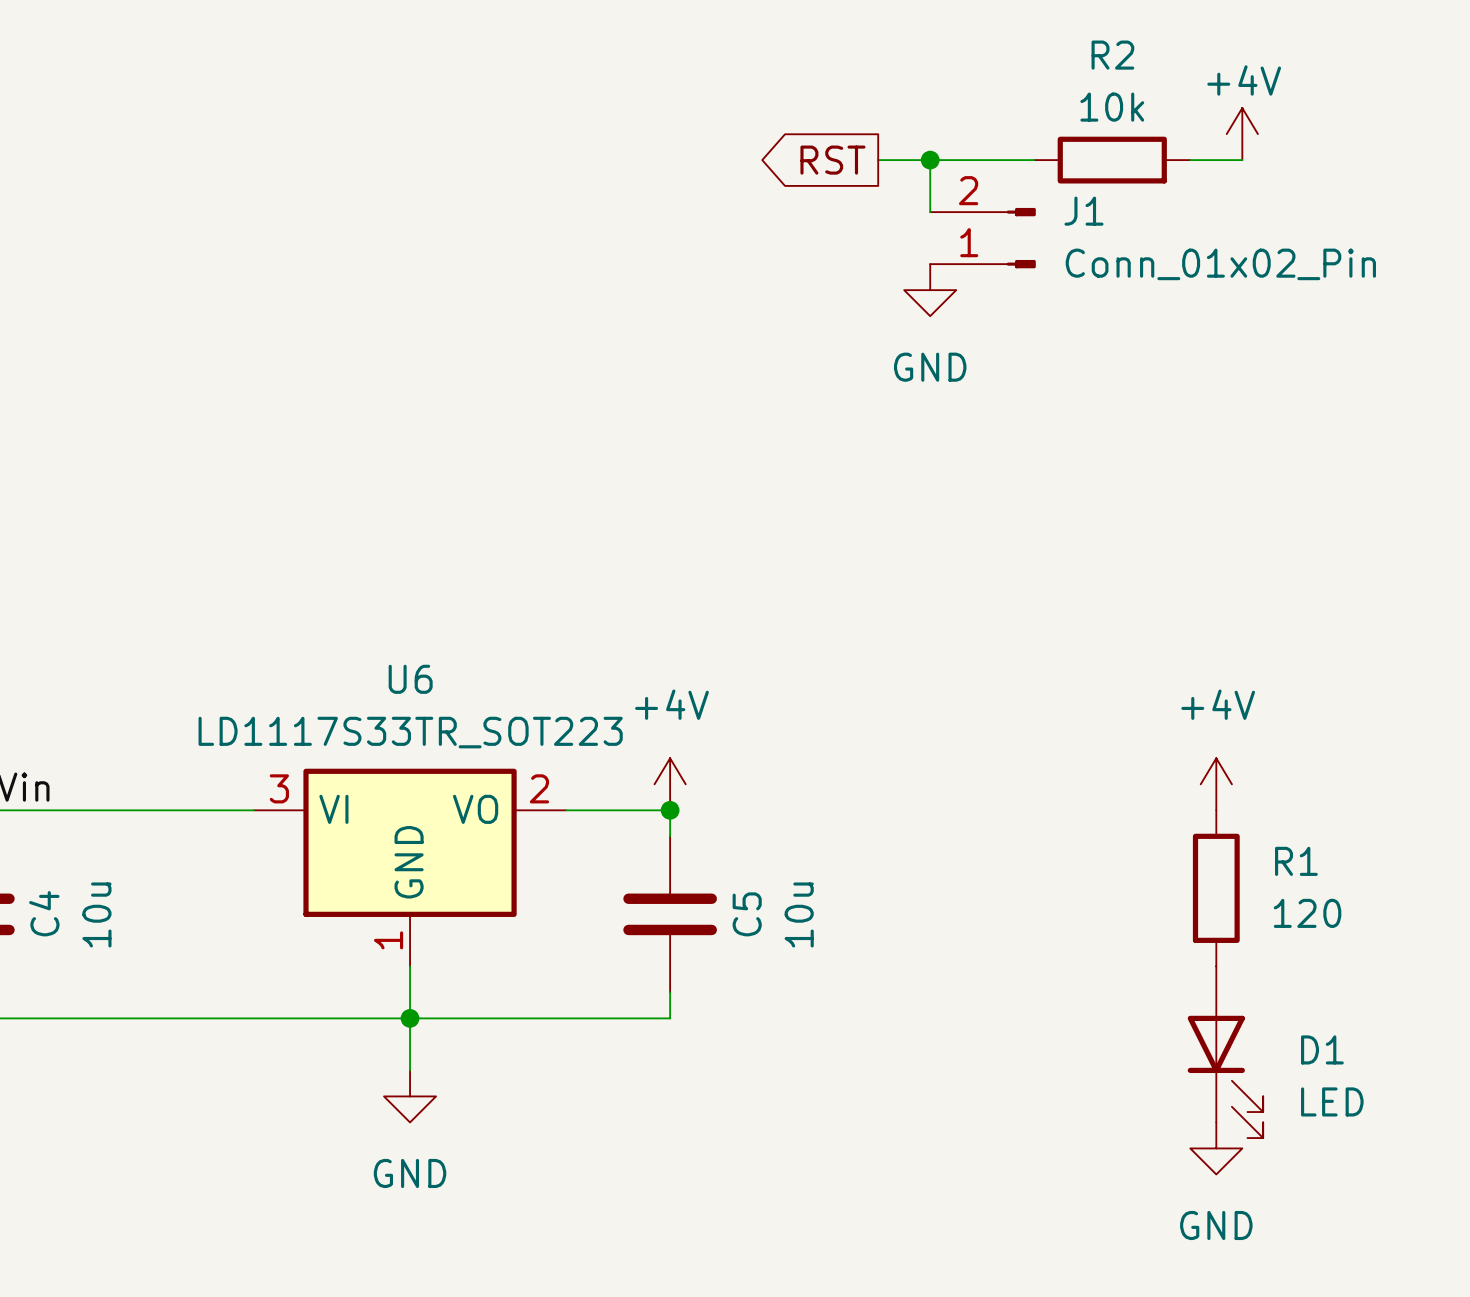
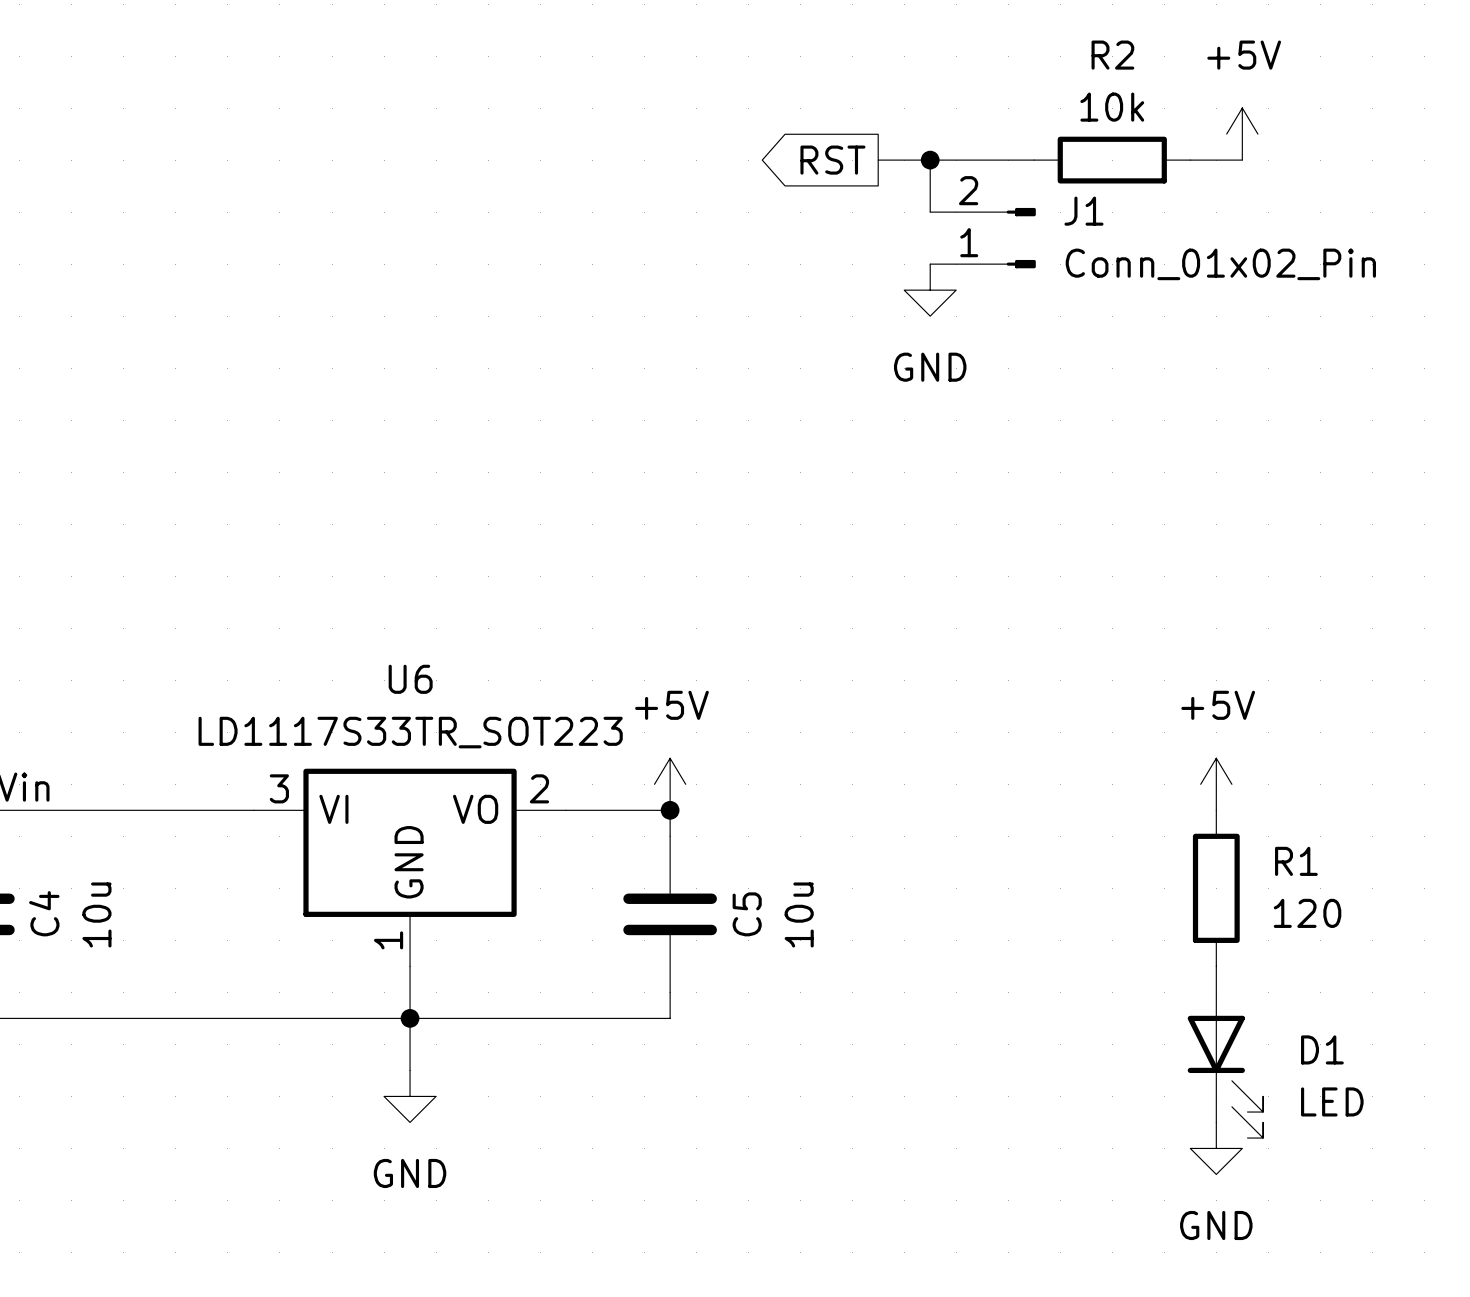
power symbol: +4V (1242, 134) -> +5V (1242, 134)
power symbol: +4V (670, 784) -> +5V (670, 784)
power symbol: +4V (1216, 784) -> +5V (1216, 784)

